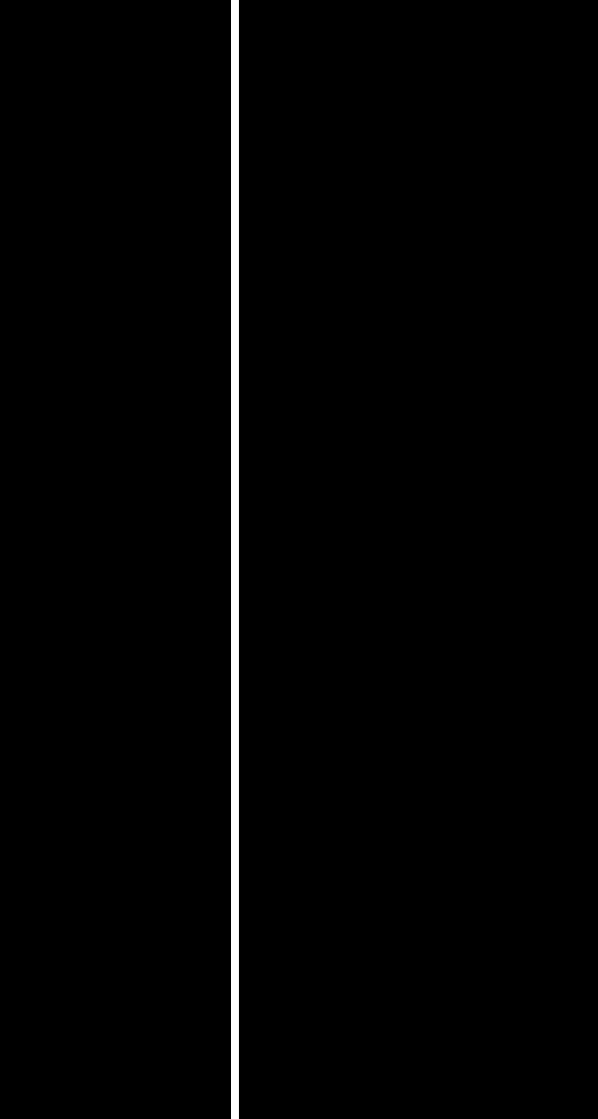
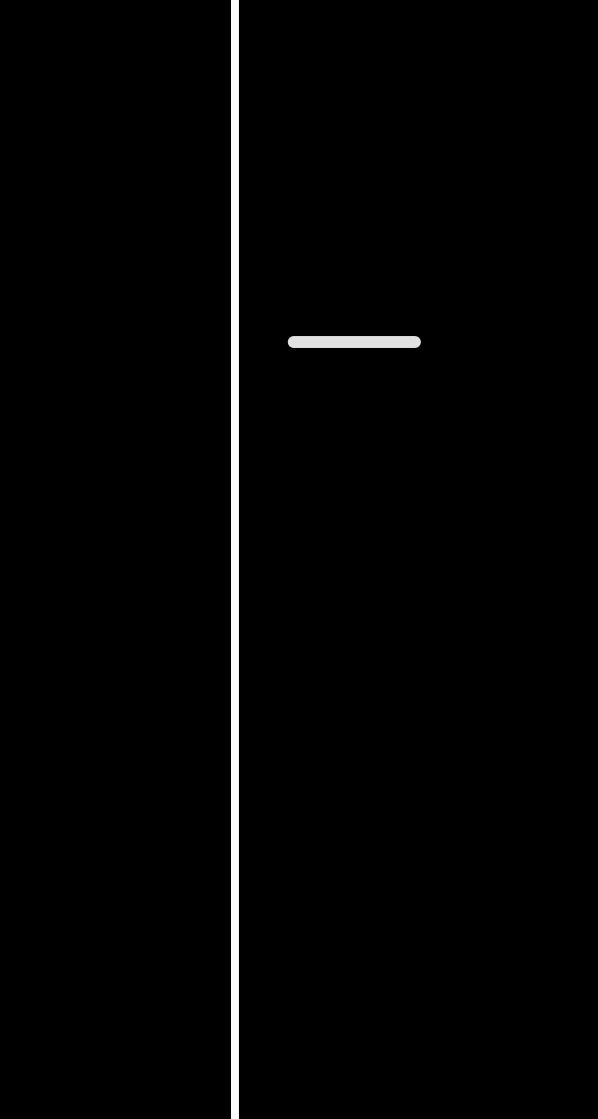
text: none -> - (354, 342)

